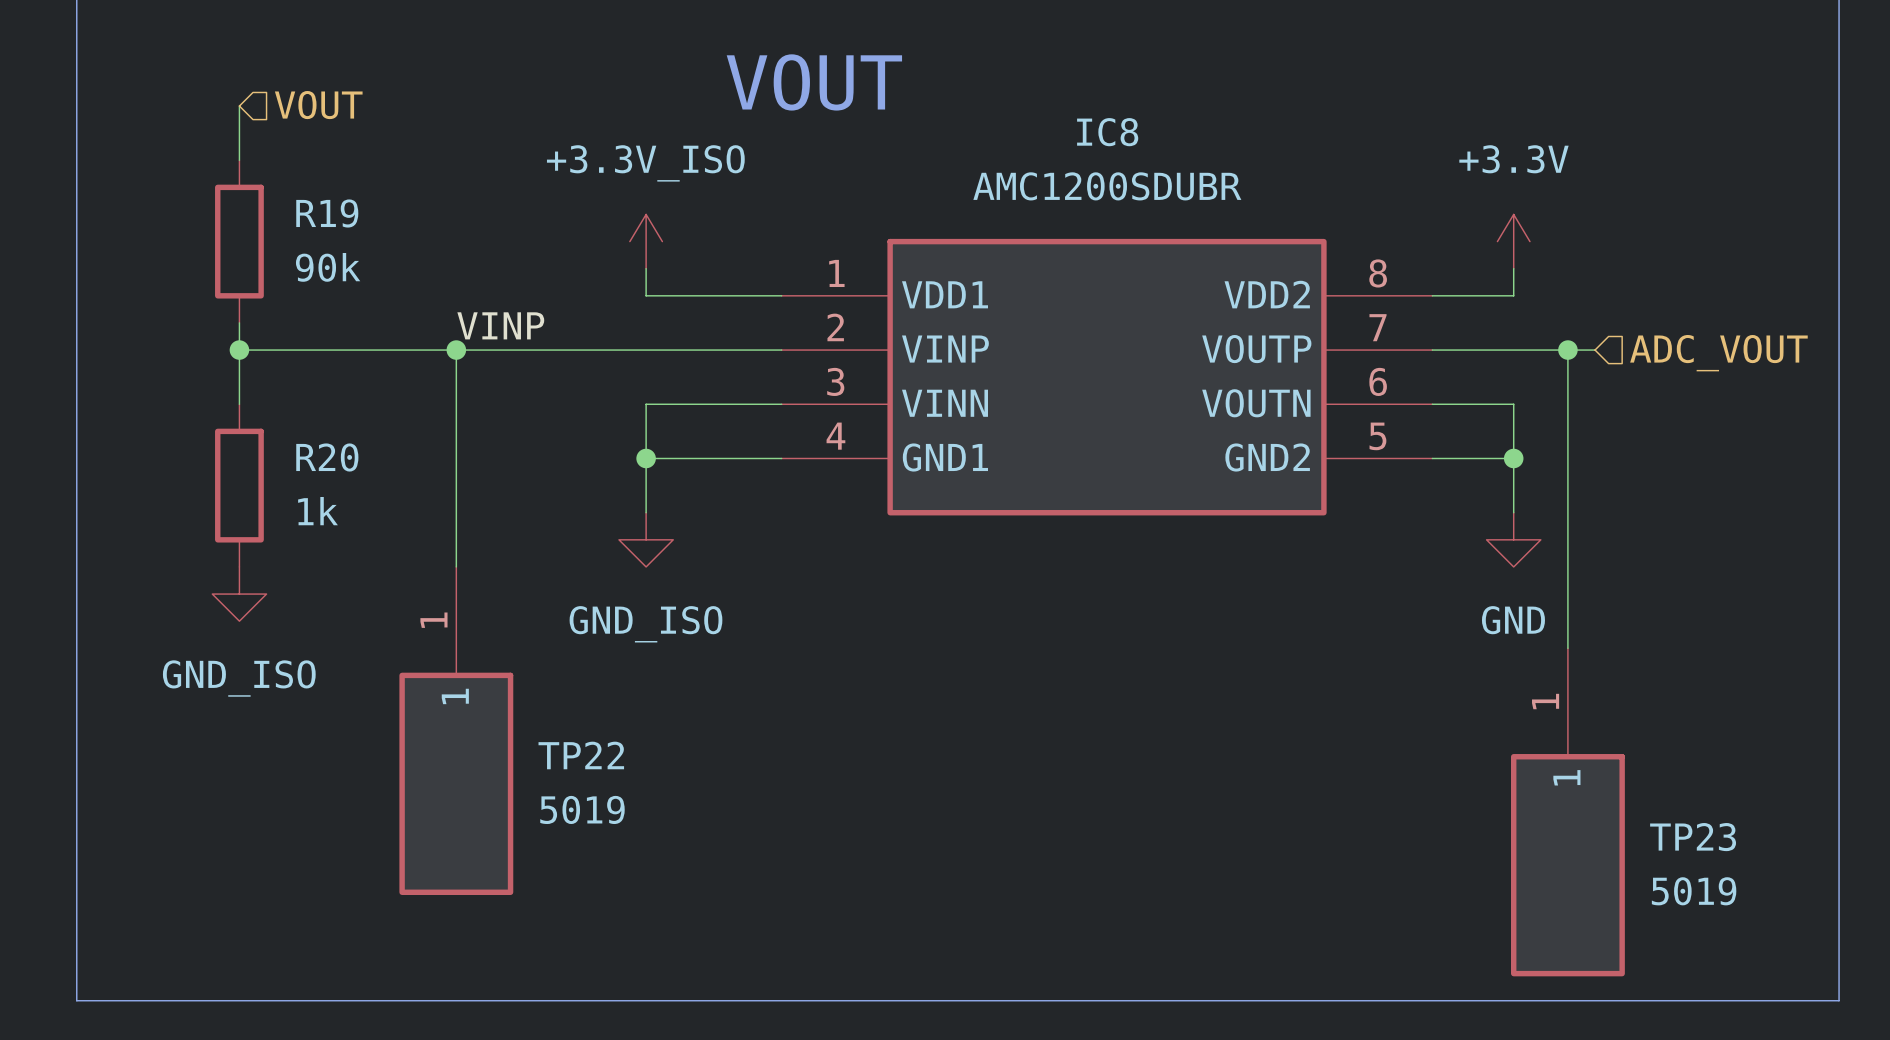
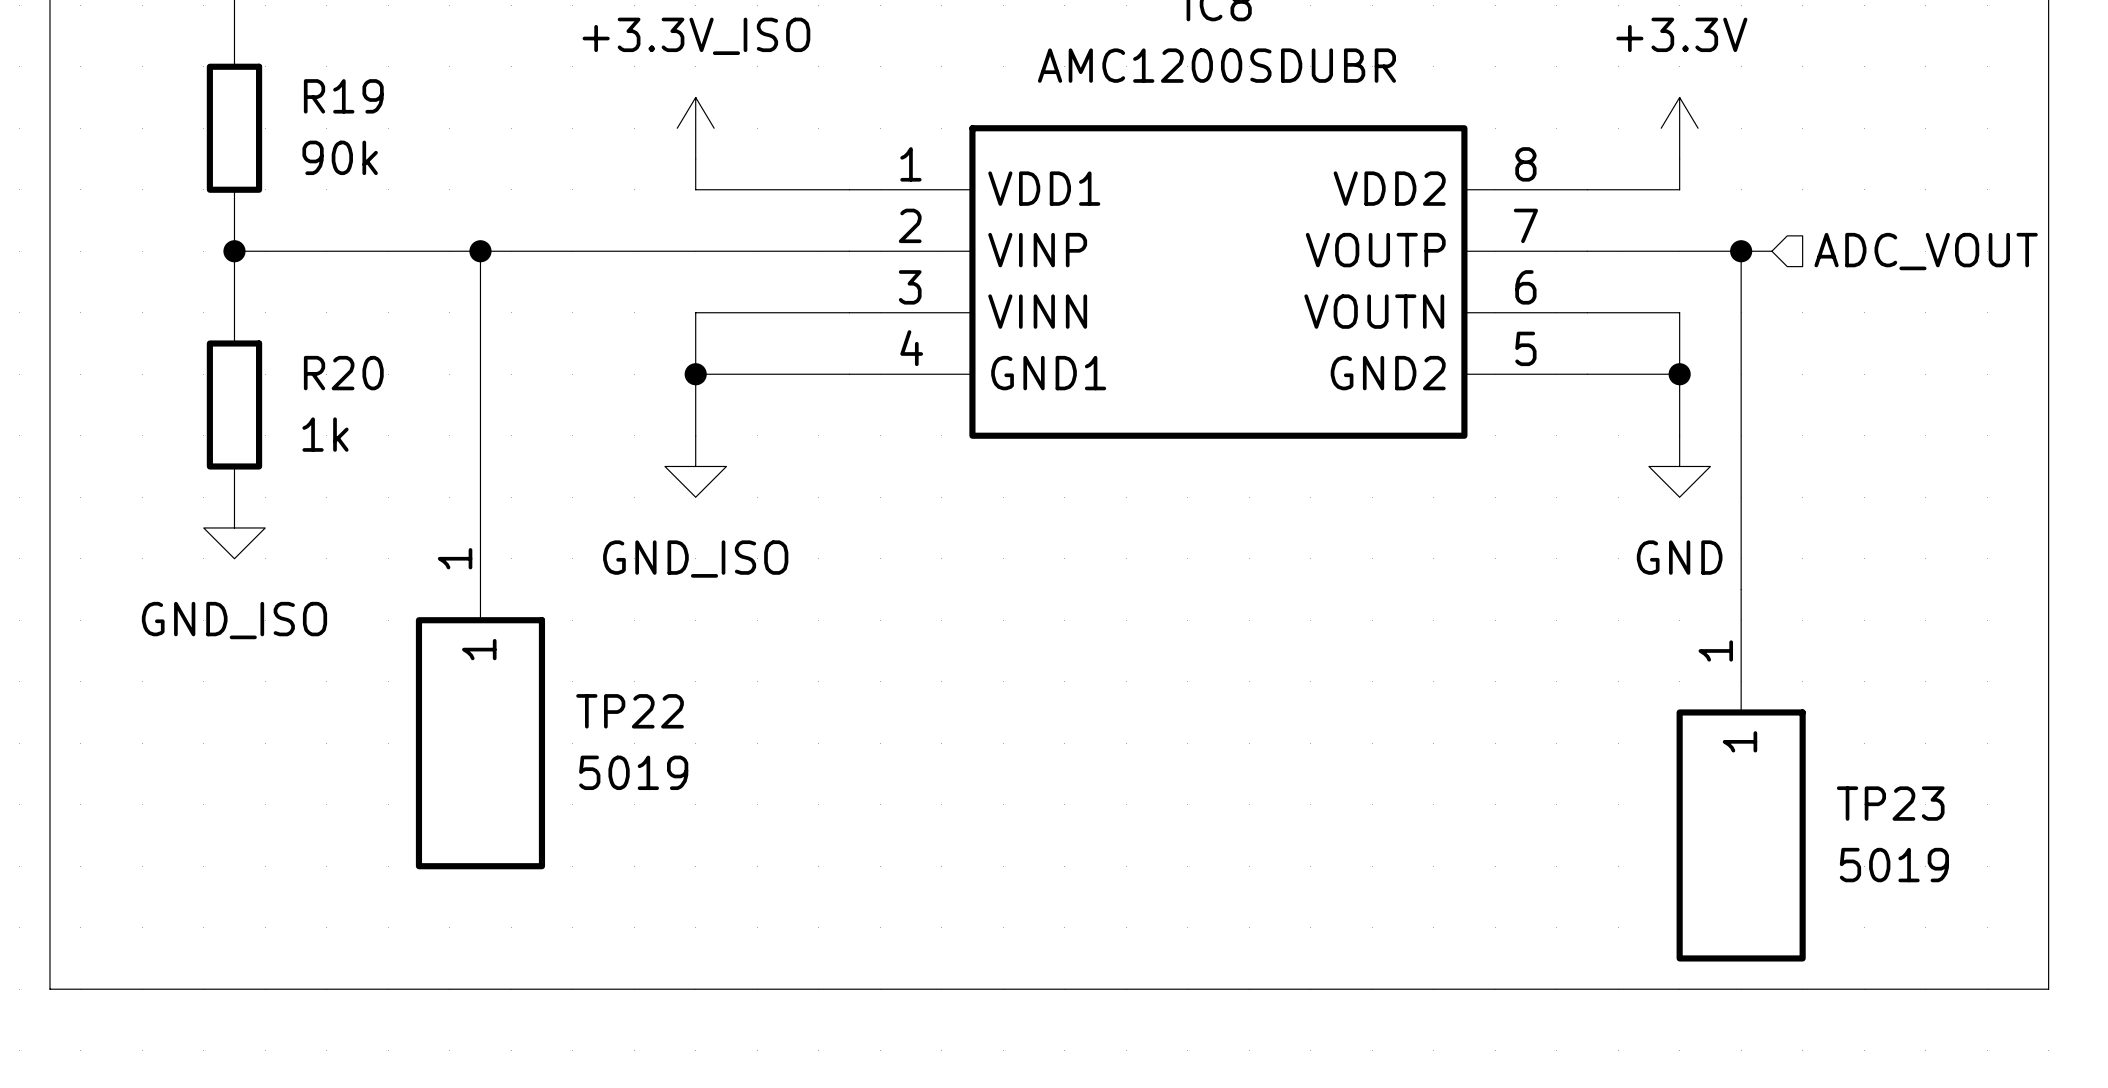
label: VINP (500, 325) -> none

